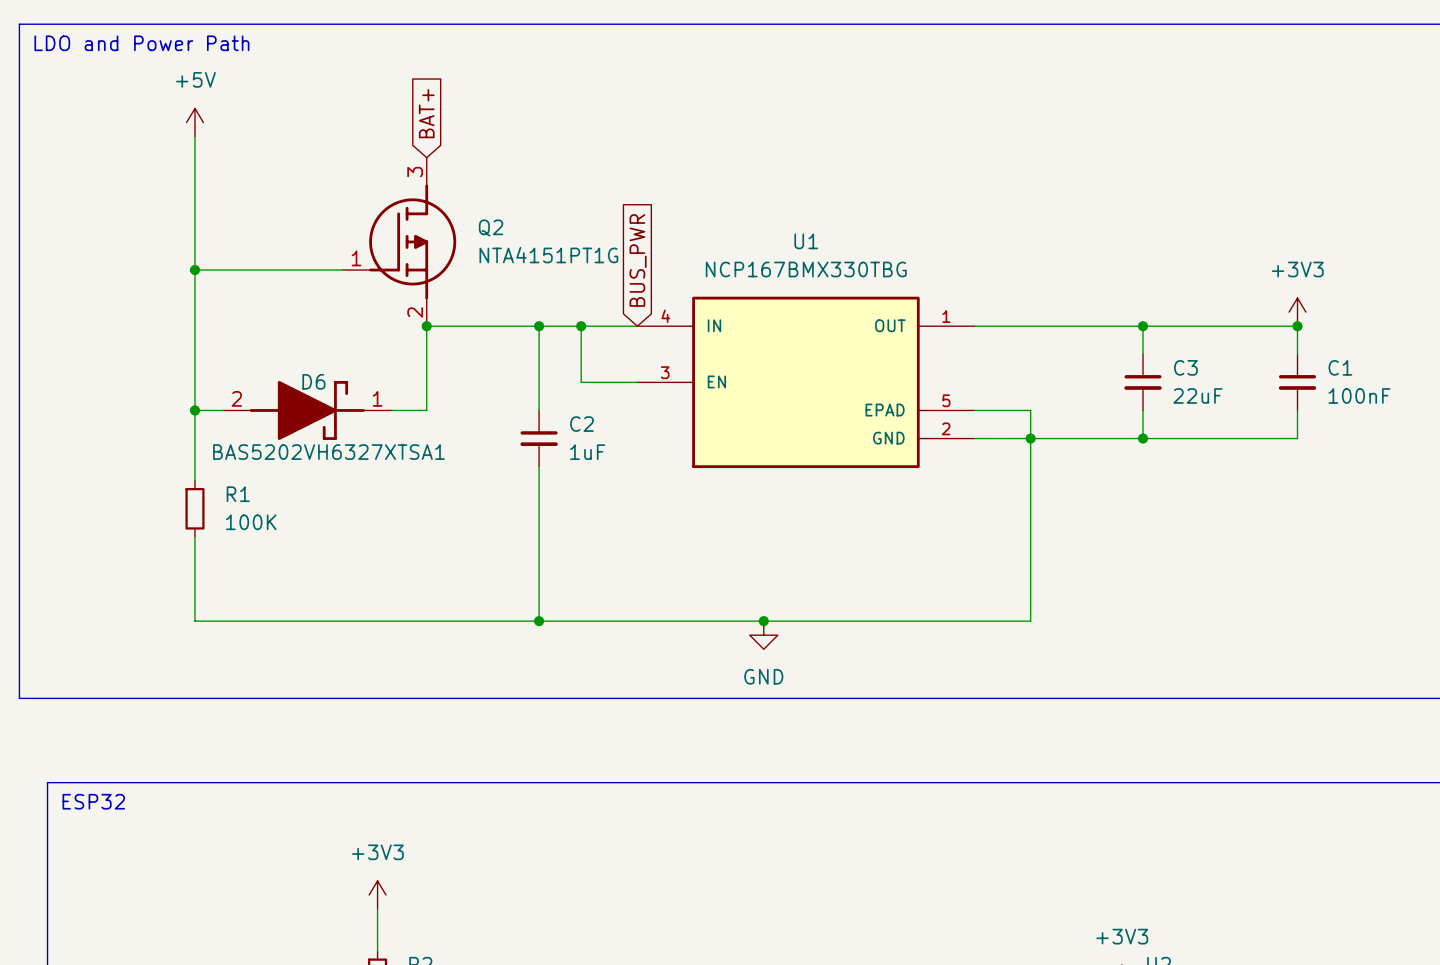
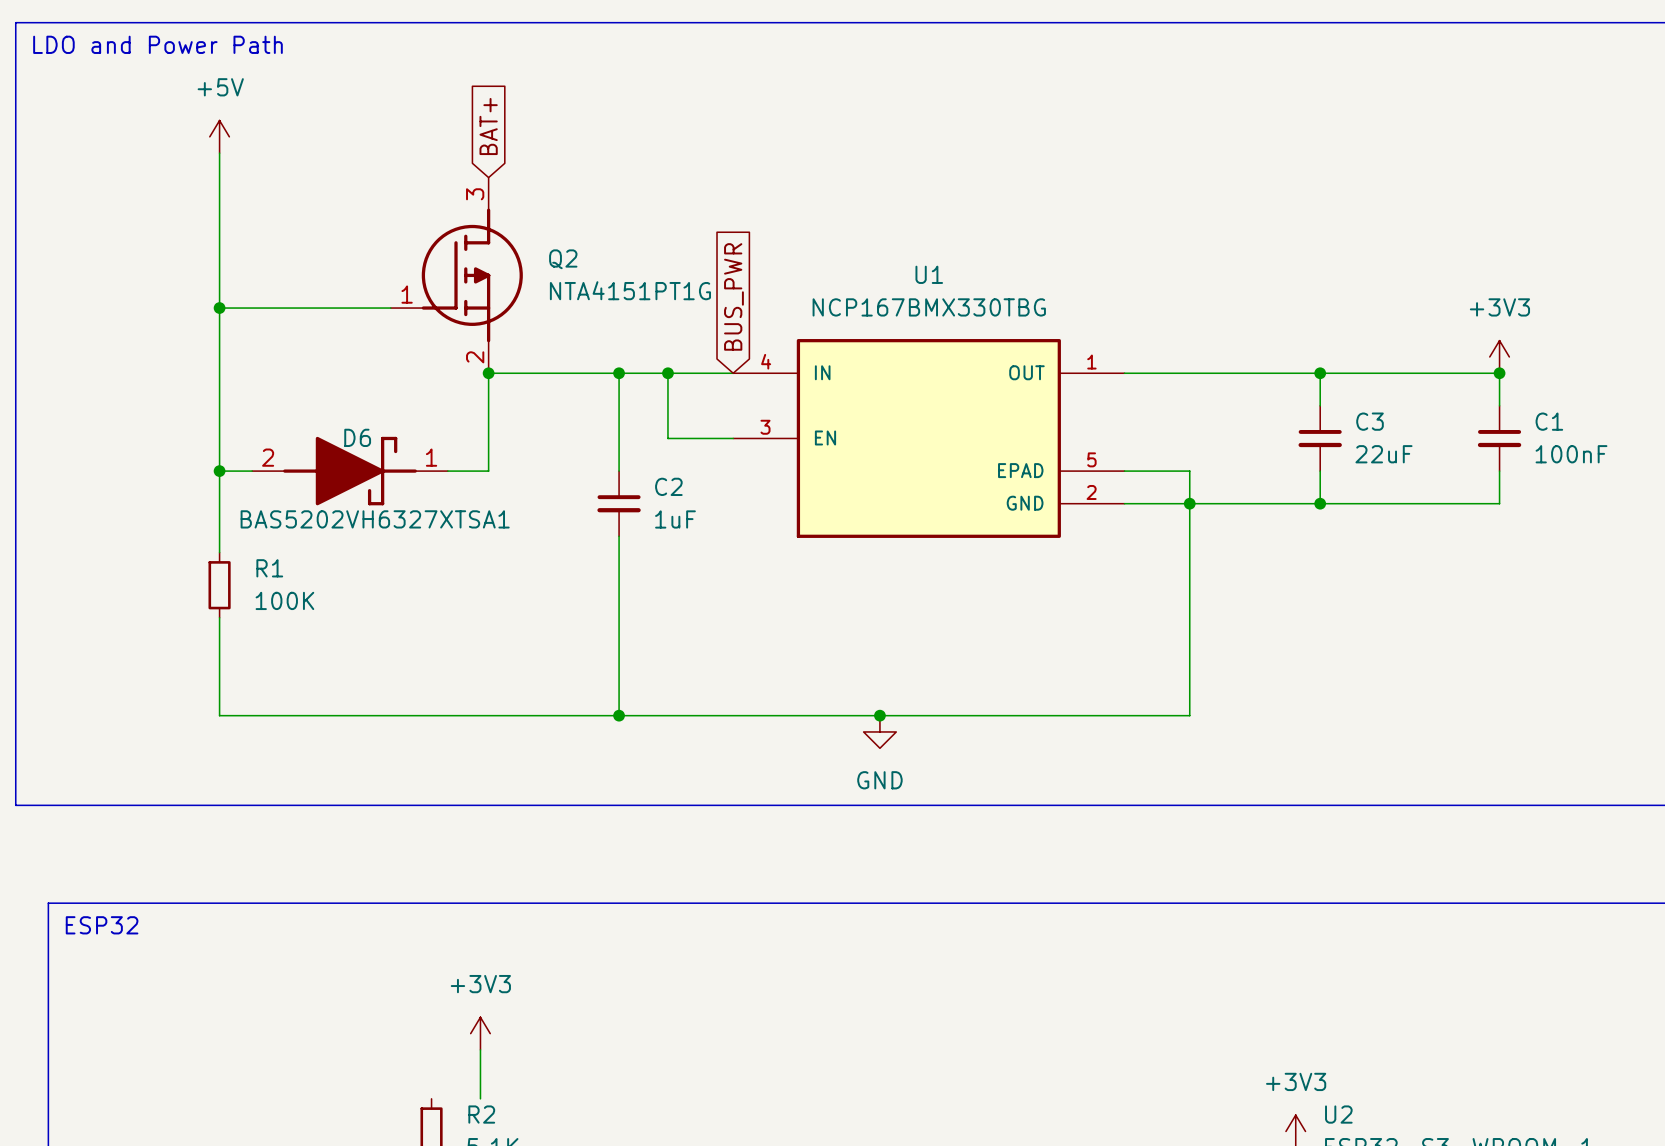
power symbol position: +3V3 (377, 895) -> +3V3 (480, 1033)
wire: (377, 909) (377, 951) -> (480, 1049) (480, 1098)

